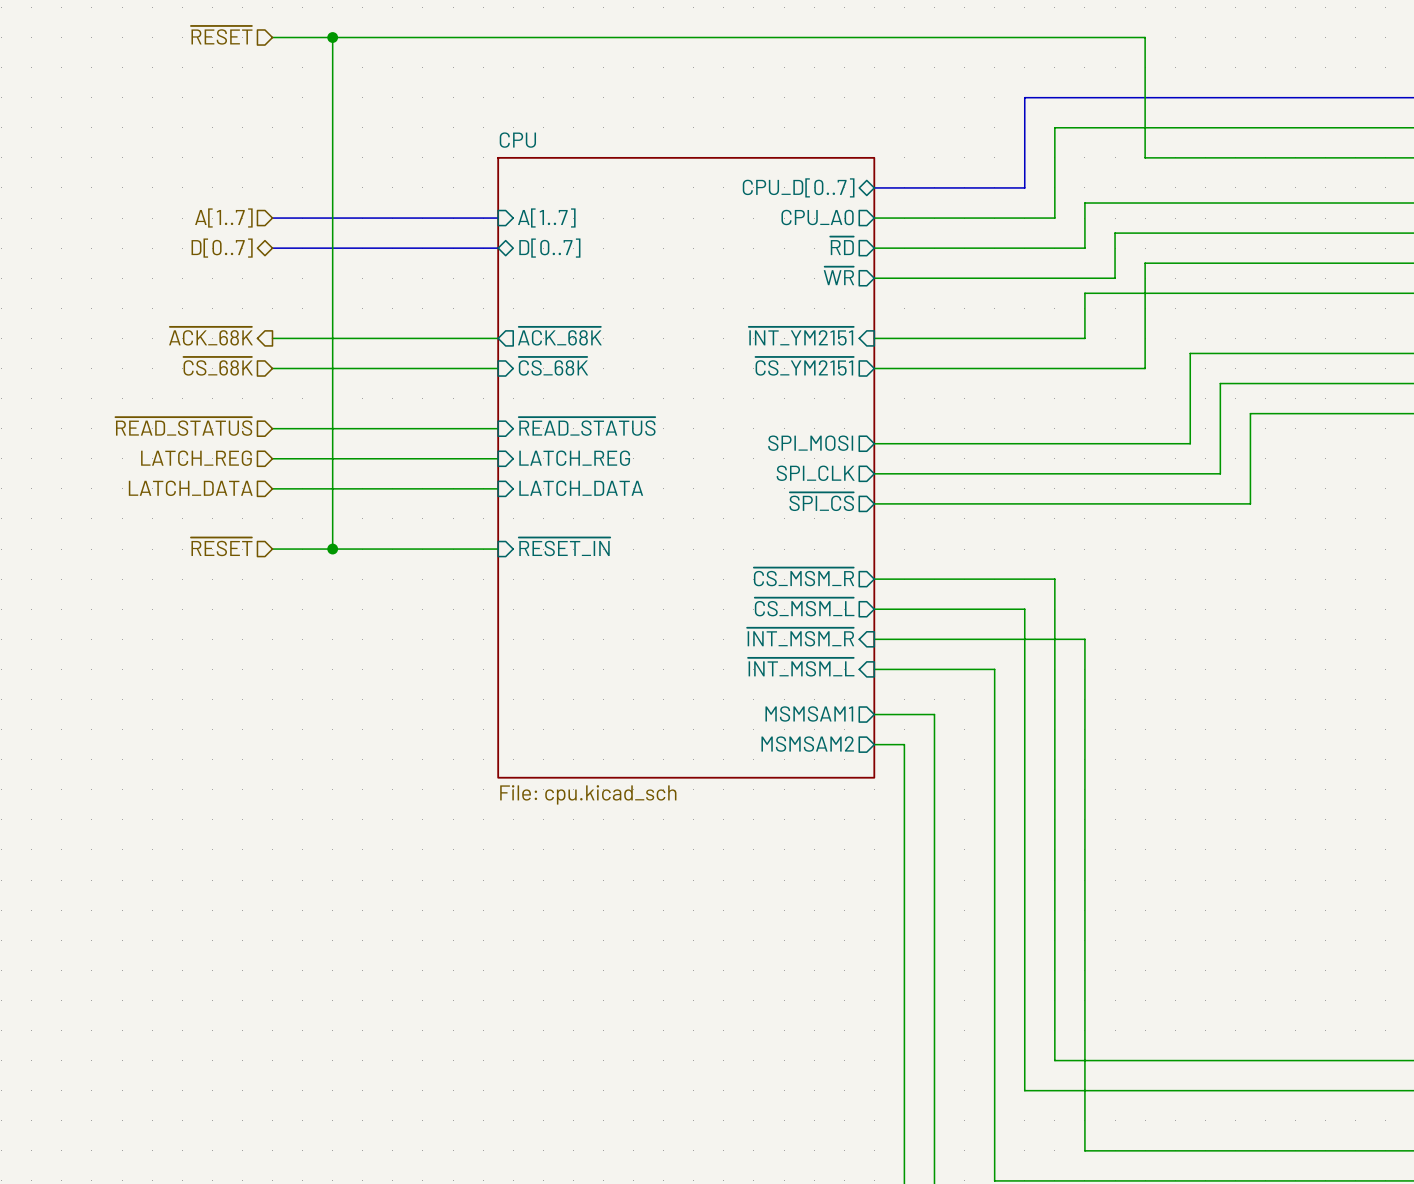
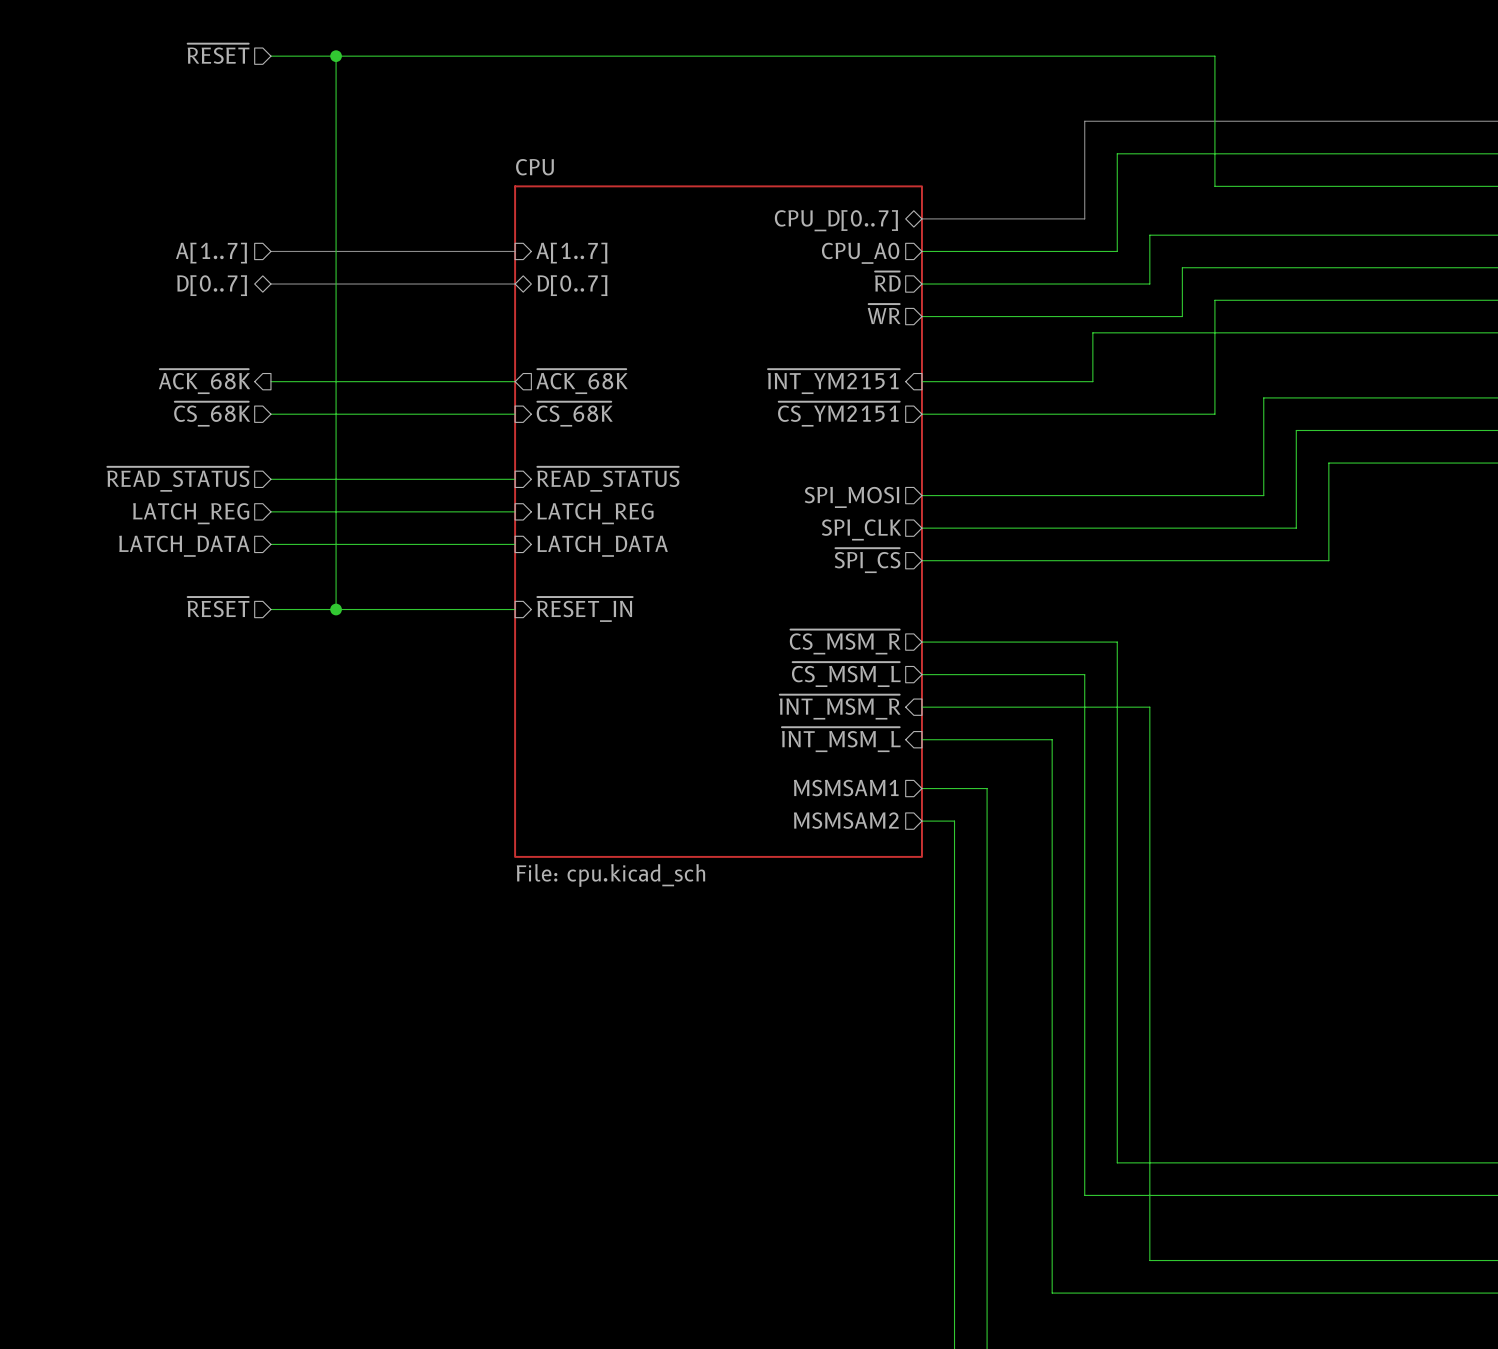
wire: (1084, 293) (1084, 338) (1032, 338) -> (1149, 332) (1092, 332) (1092, 381)

